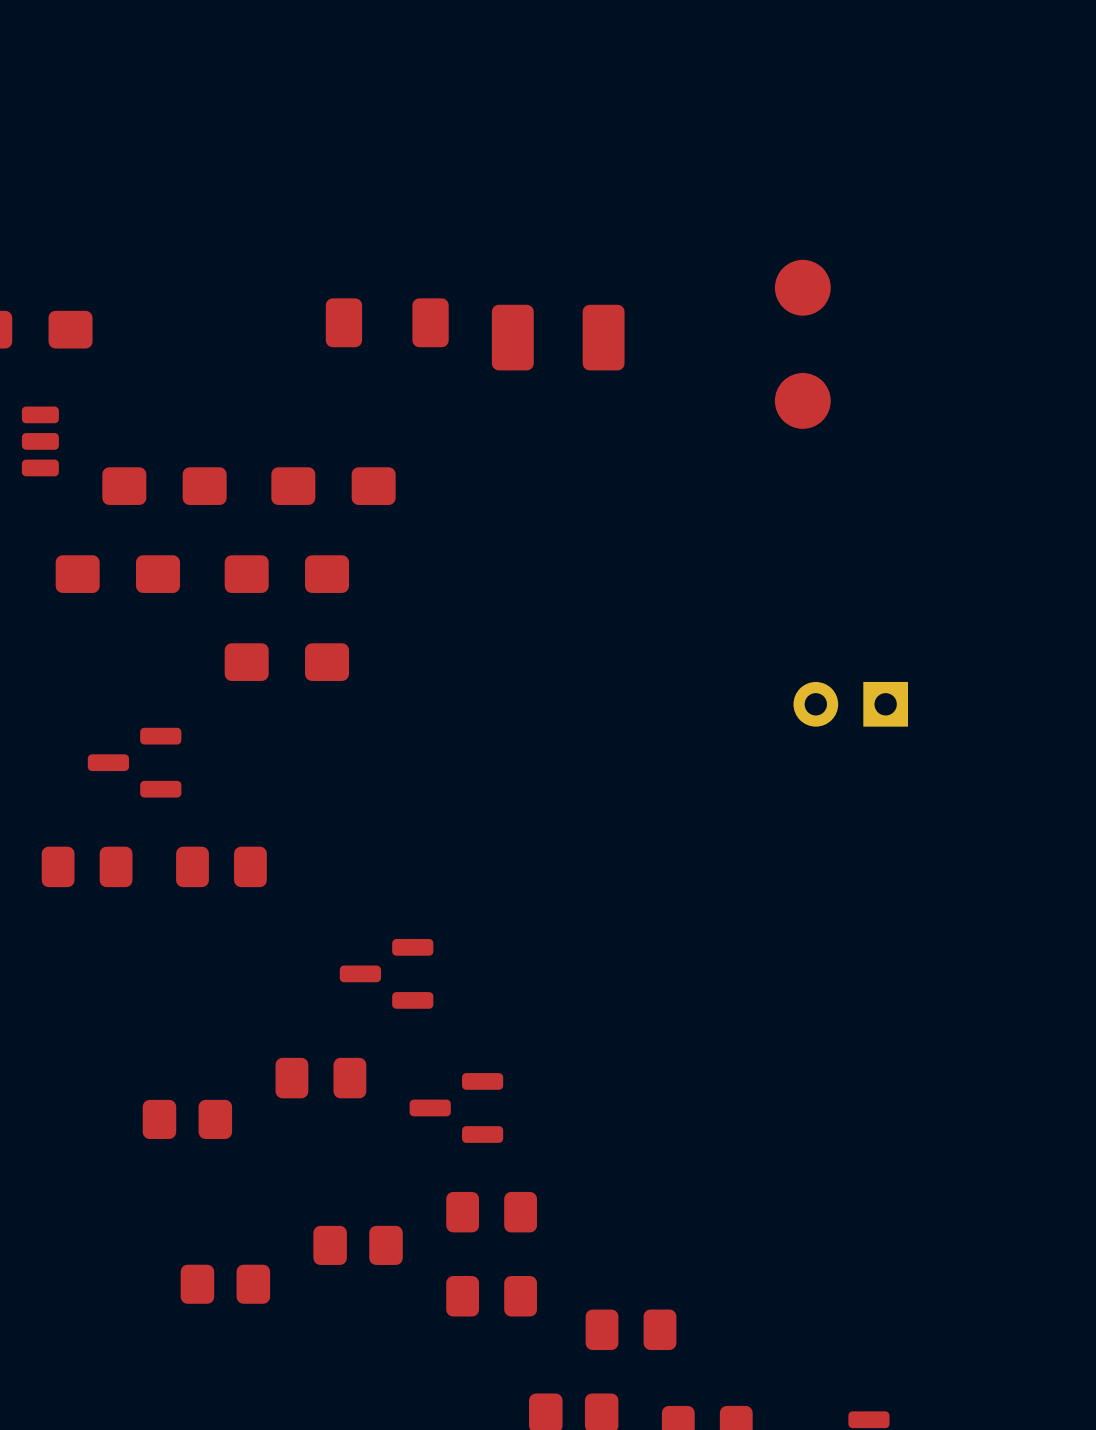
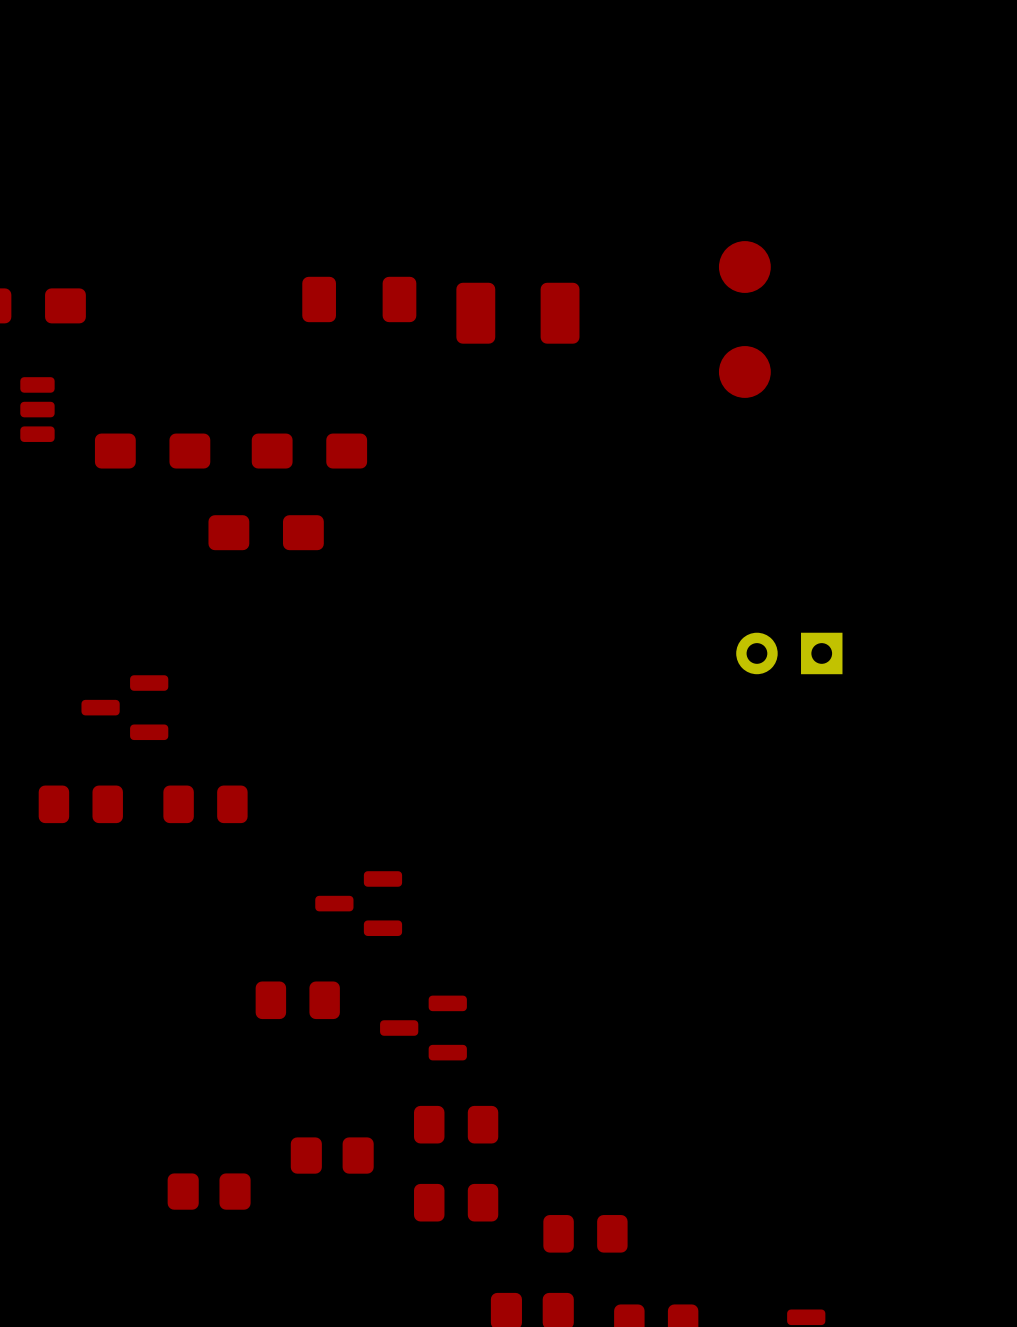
part: (117, 574) -> none
part: (286, 662) -> none
part: (187, 1119) -> none

